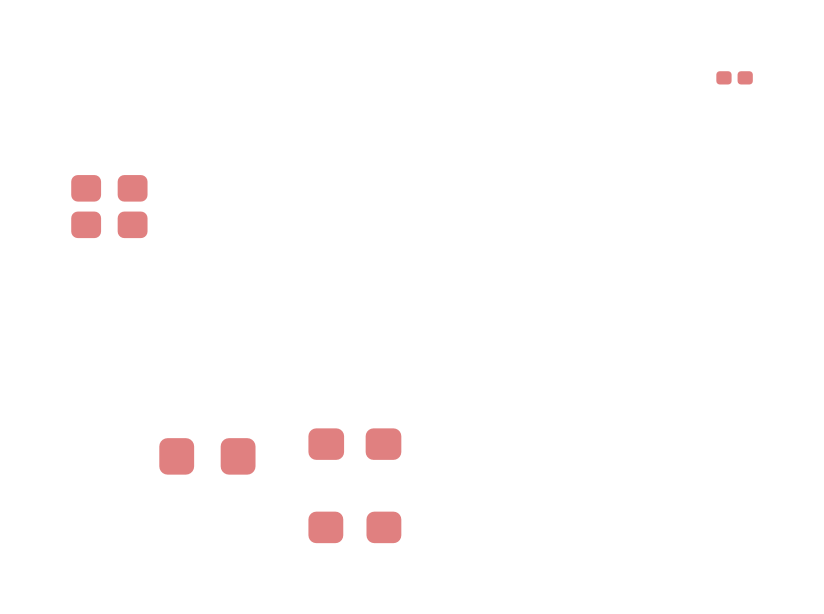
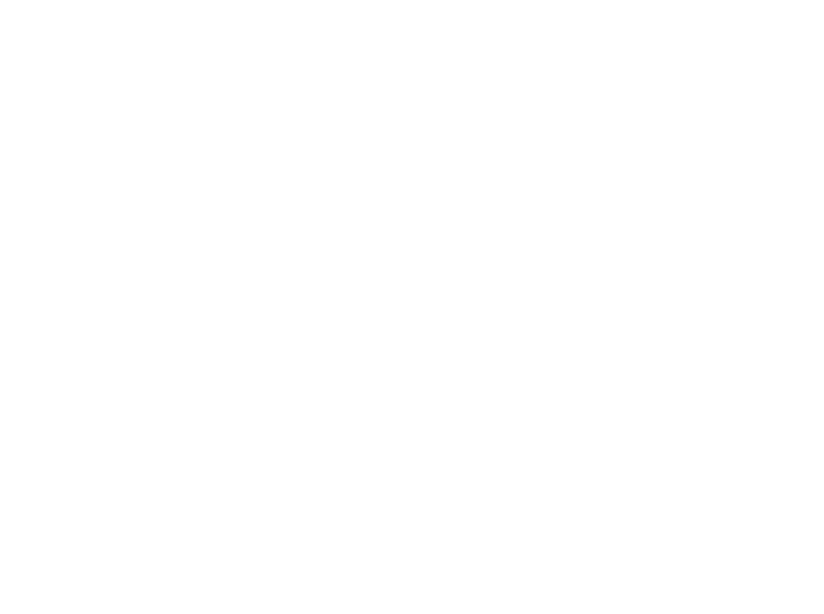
part: (734, 77) -> none
part: (109, 206) -> none
part: (354, 444) -> none
part: (207, 456) -> none
part: (354, 527) -> none

